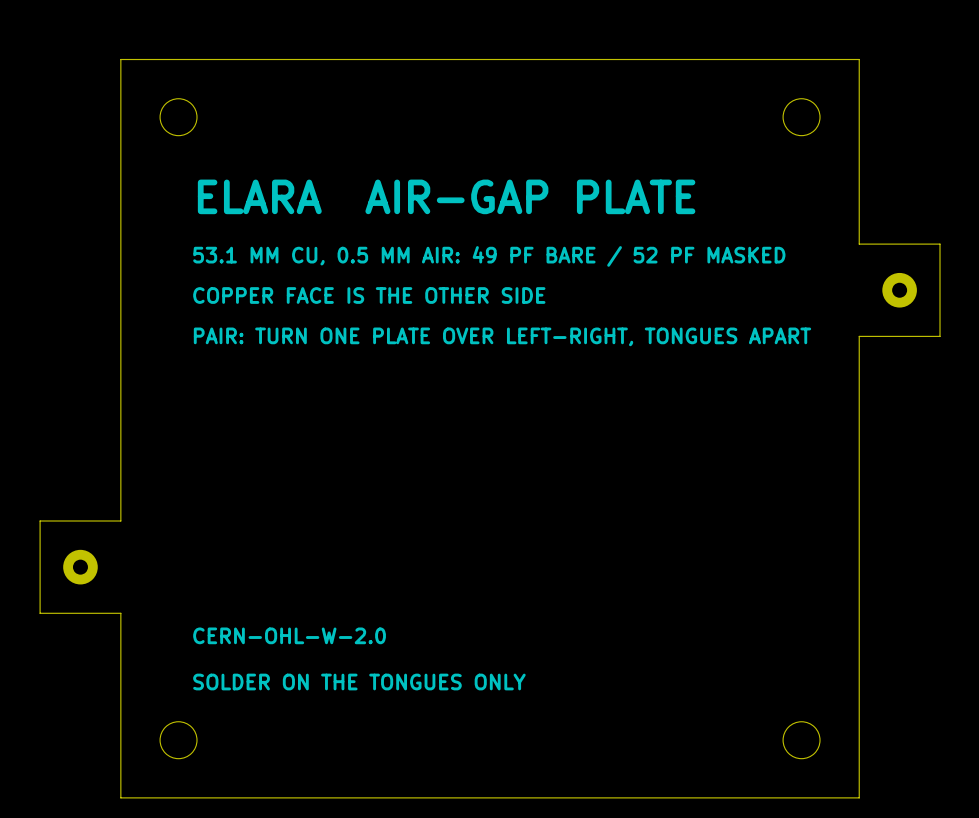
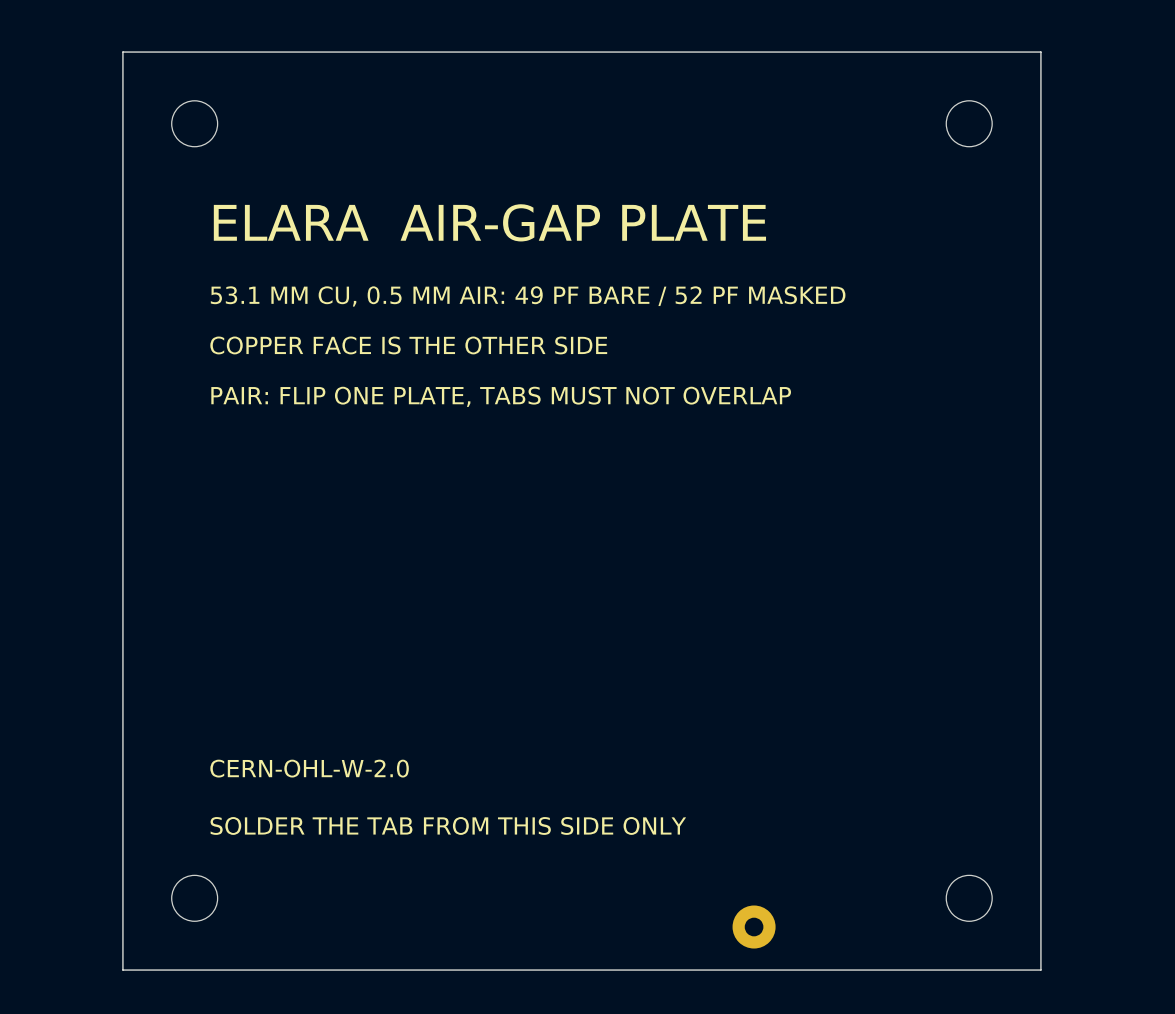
board edge: (859, 244) (940, 244) (940, 336) (859, 336) -> (1040, 281) (1040, 396)
part: (899, 290) -> none
text: PAIR: TURN ONE PLATE OVER LEFT-RIGHT, TONGUES APART (502, 336) -> PAIR: FLIP ONE PLATE, TABS MUST NOT OVERLAP (501, 396)
board edge: (120, 521) (40, 521) (40, 613) (120, 613) -> (122, 625) (122, 740)
part: (80, 567) -> none
text: SOLDER ON THE TONGUES ONLY (359, 682) -> SOLDER THE TAB FROM THIS SIDE ONLY (448, 825)
part: none -> (754, 927)

